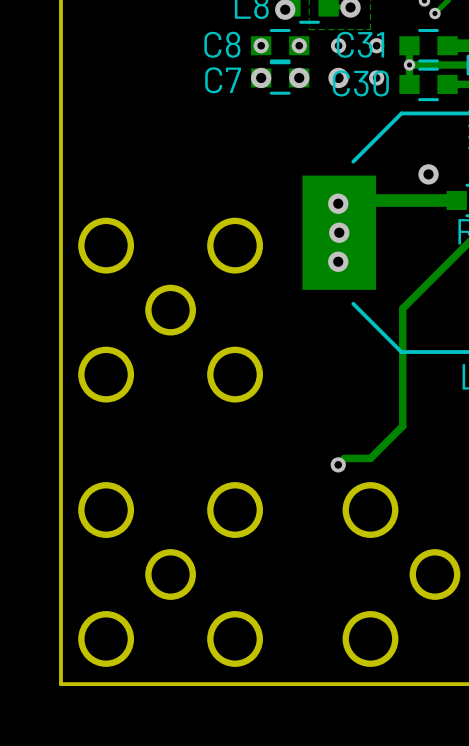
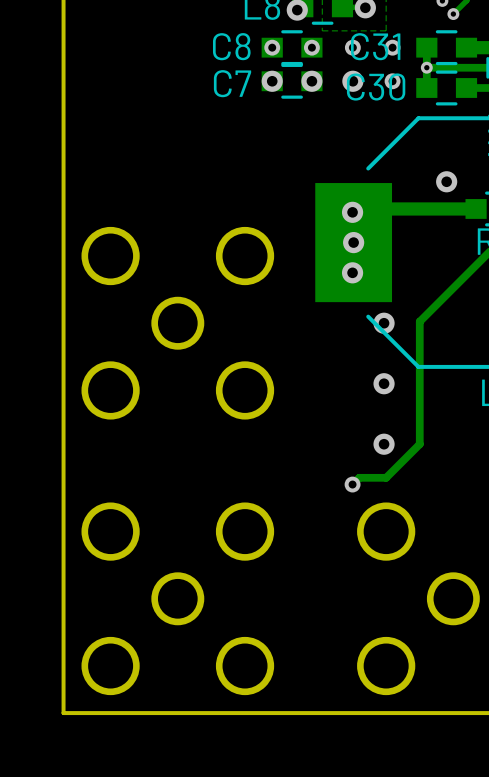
via: none -> (384, 323)
via: none -> (384, 383)
via: none -> (384, 444)

